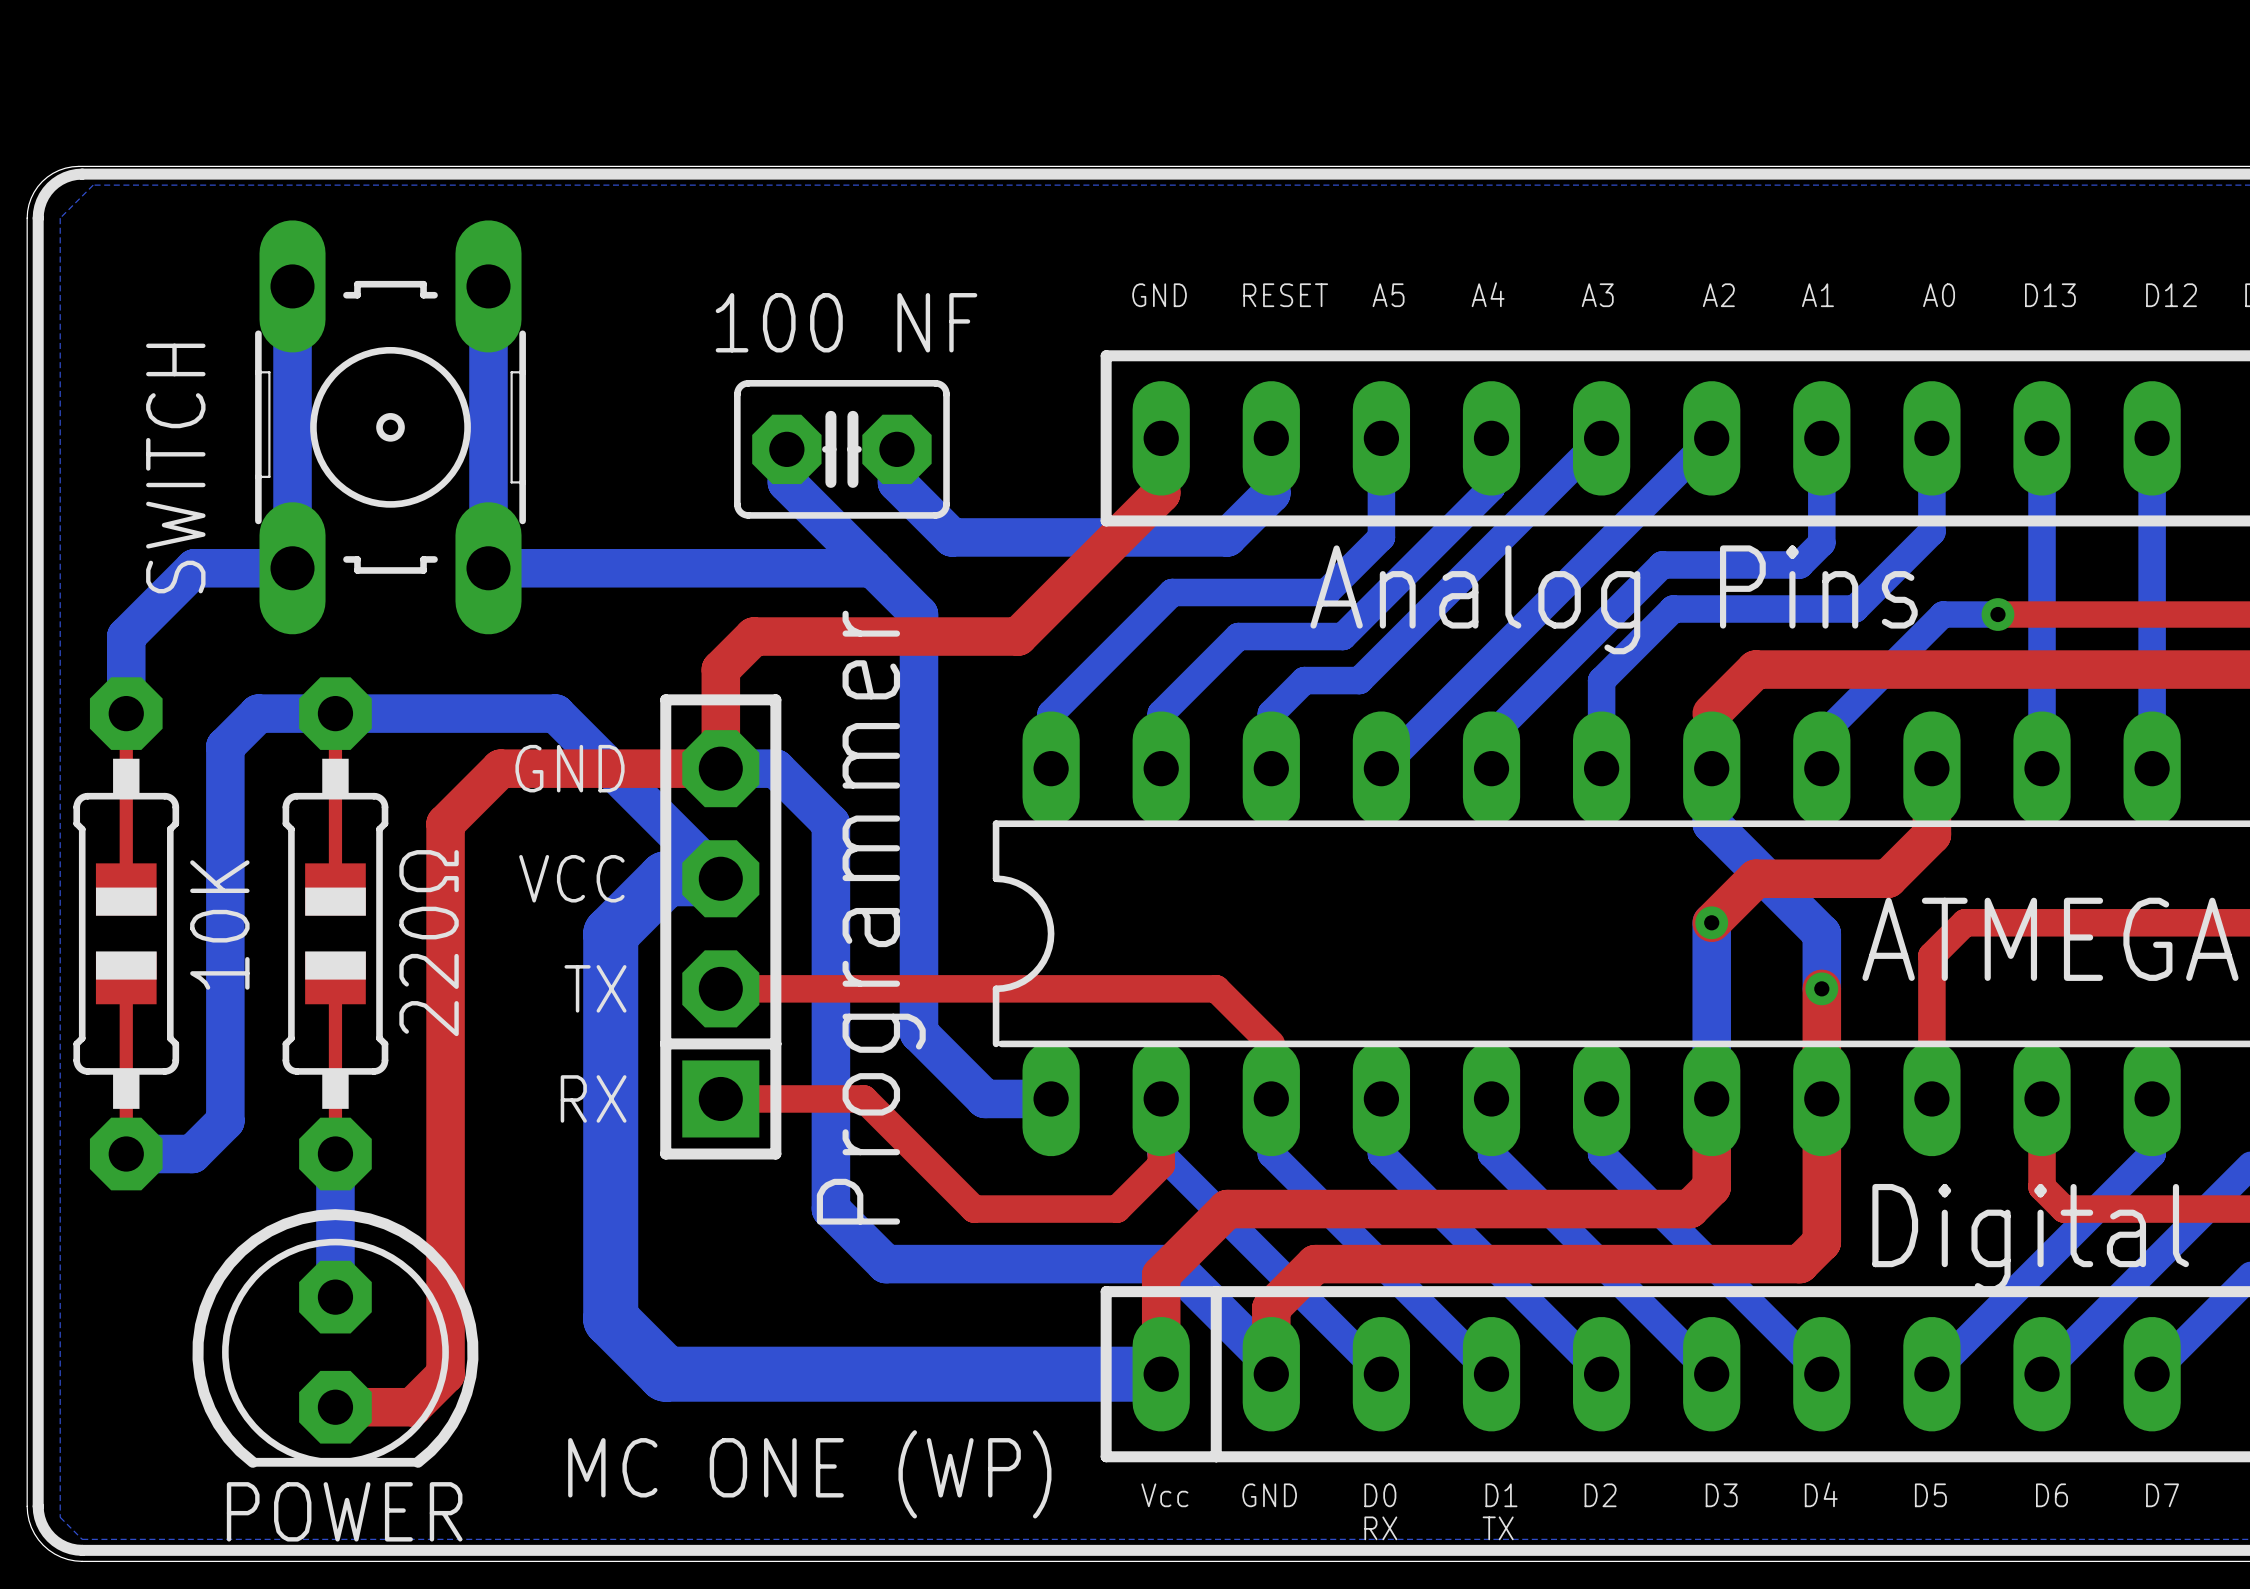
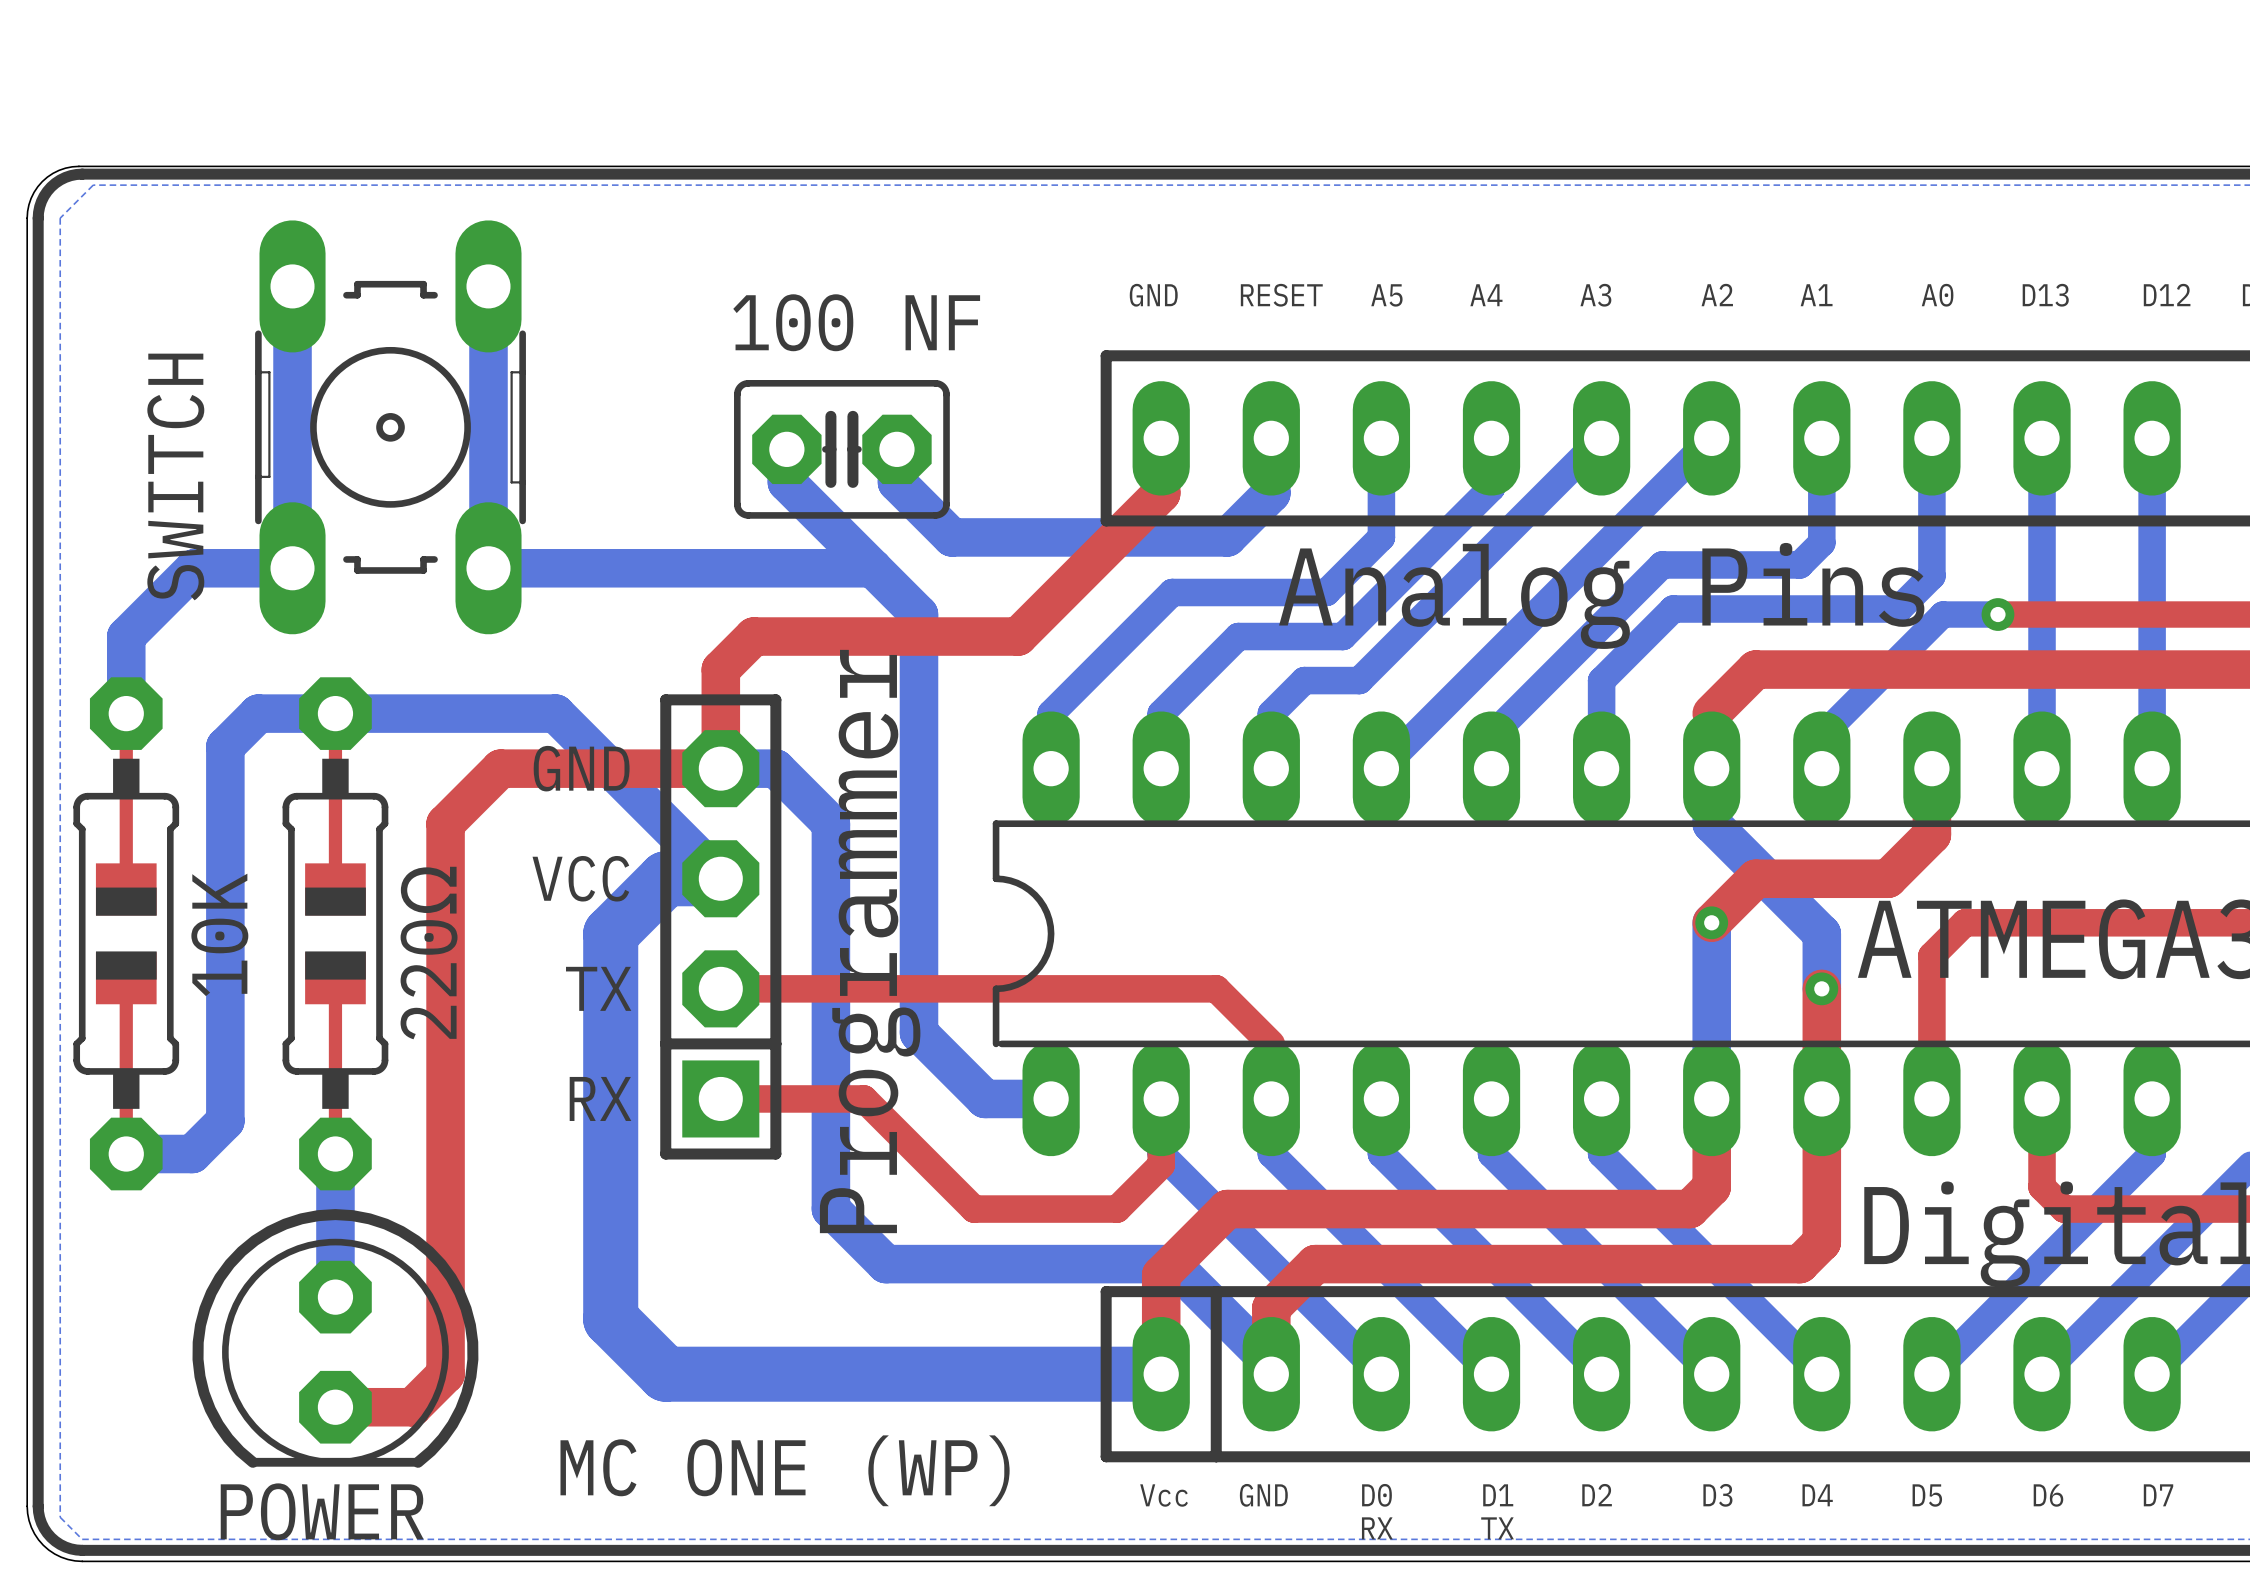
bottom track: (1931, 531) (1854, 609) -> (1931, 531) (1931, 575) (1898, 609) (1854, 609)

